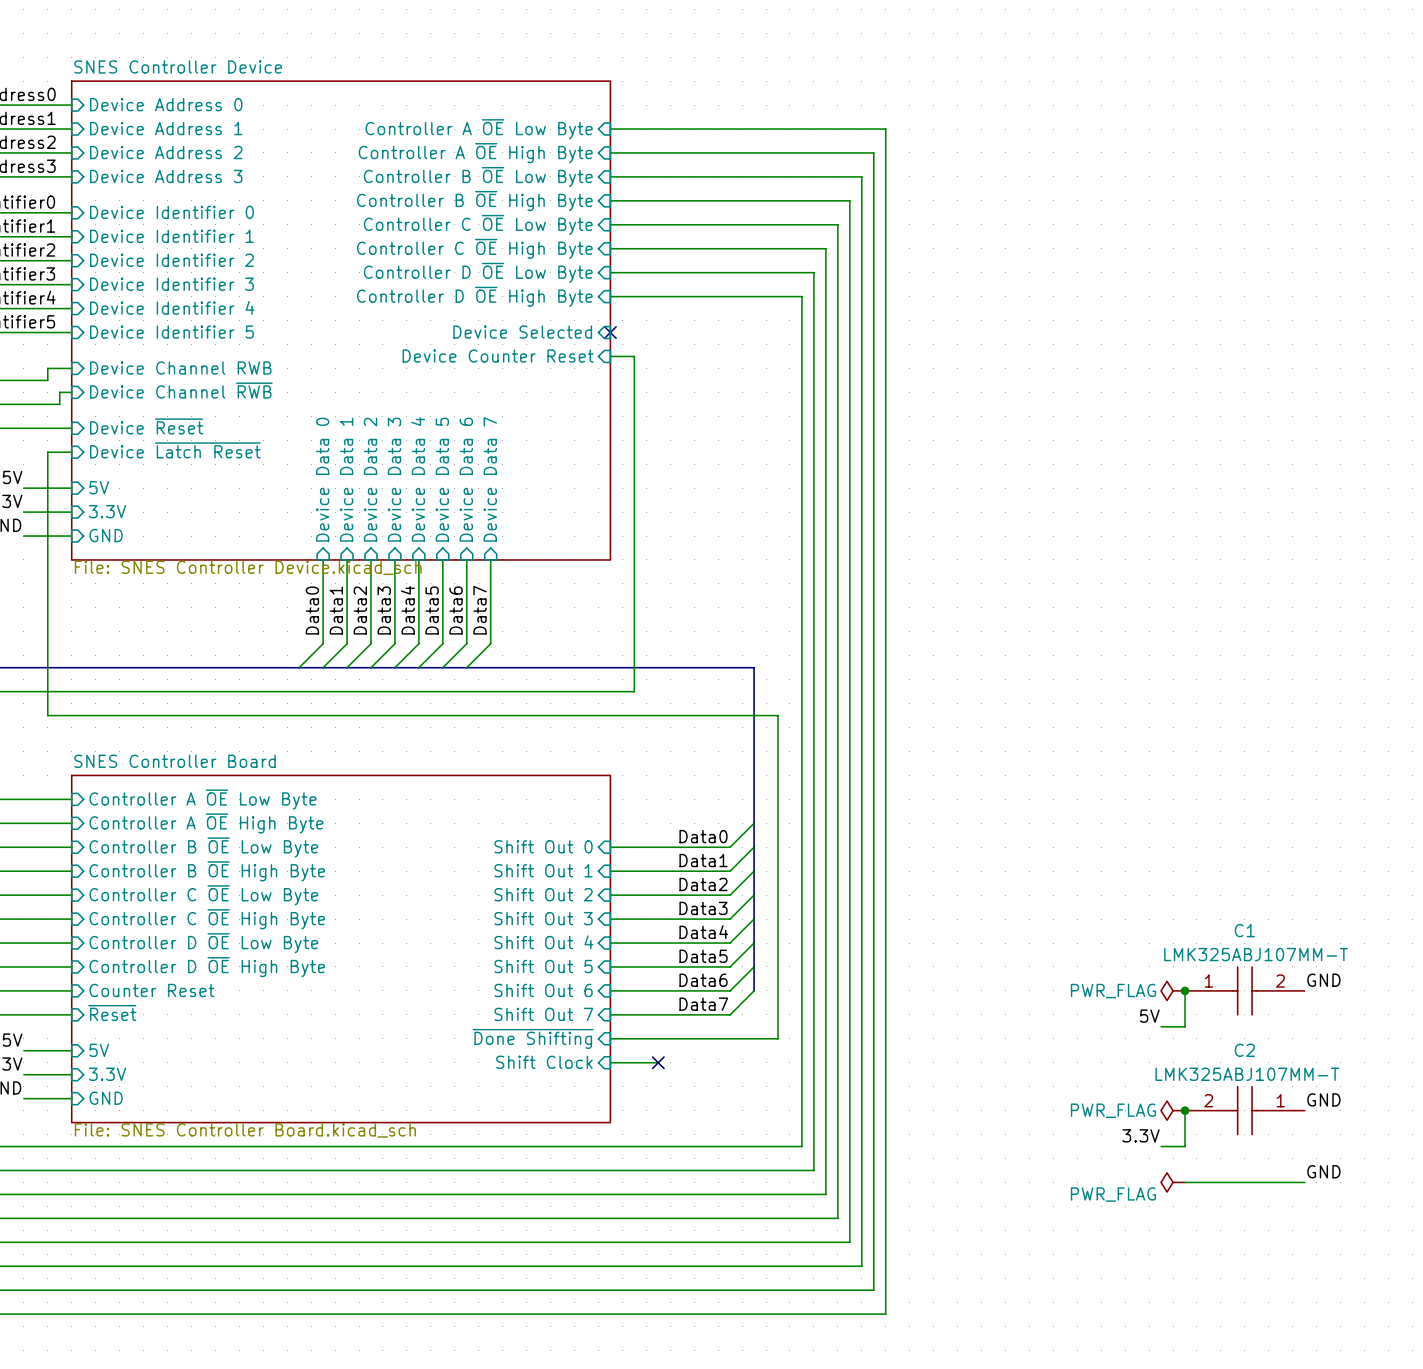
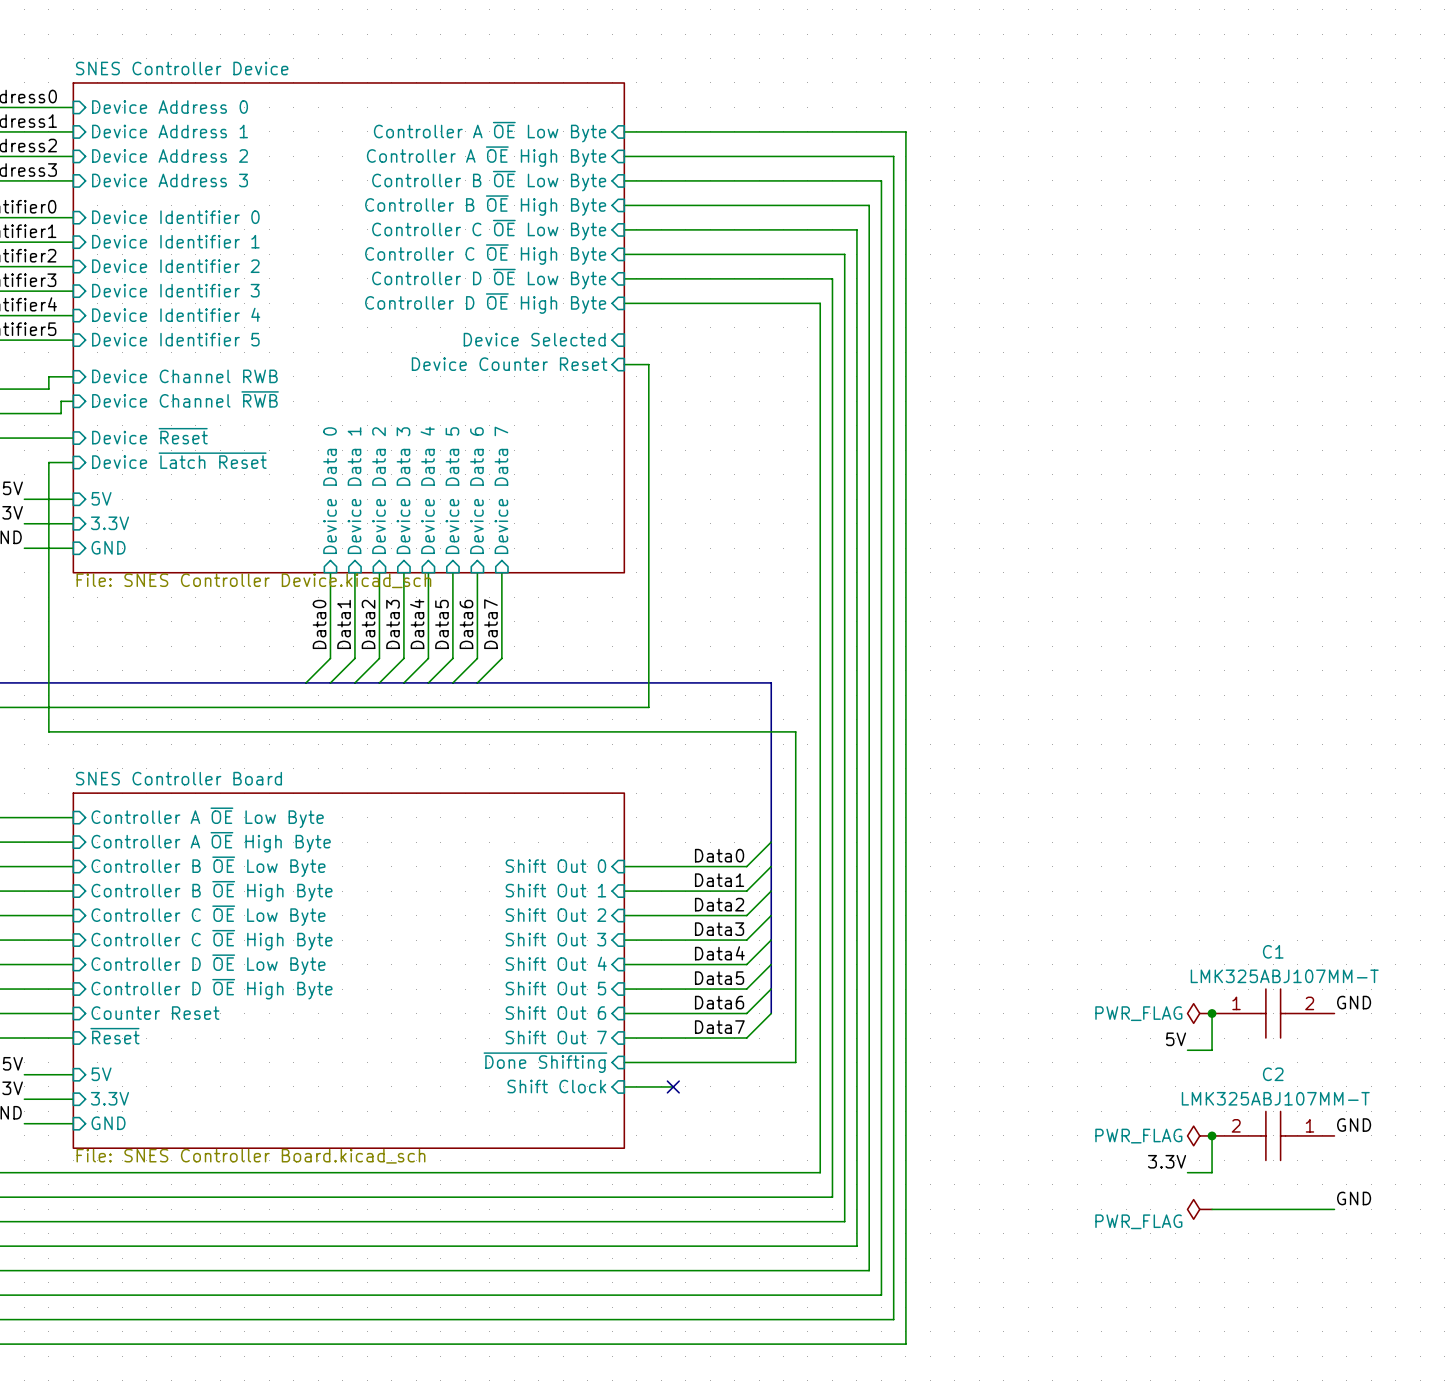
no-connect mark: (610, 332) -> none

